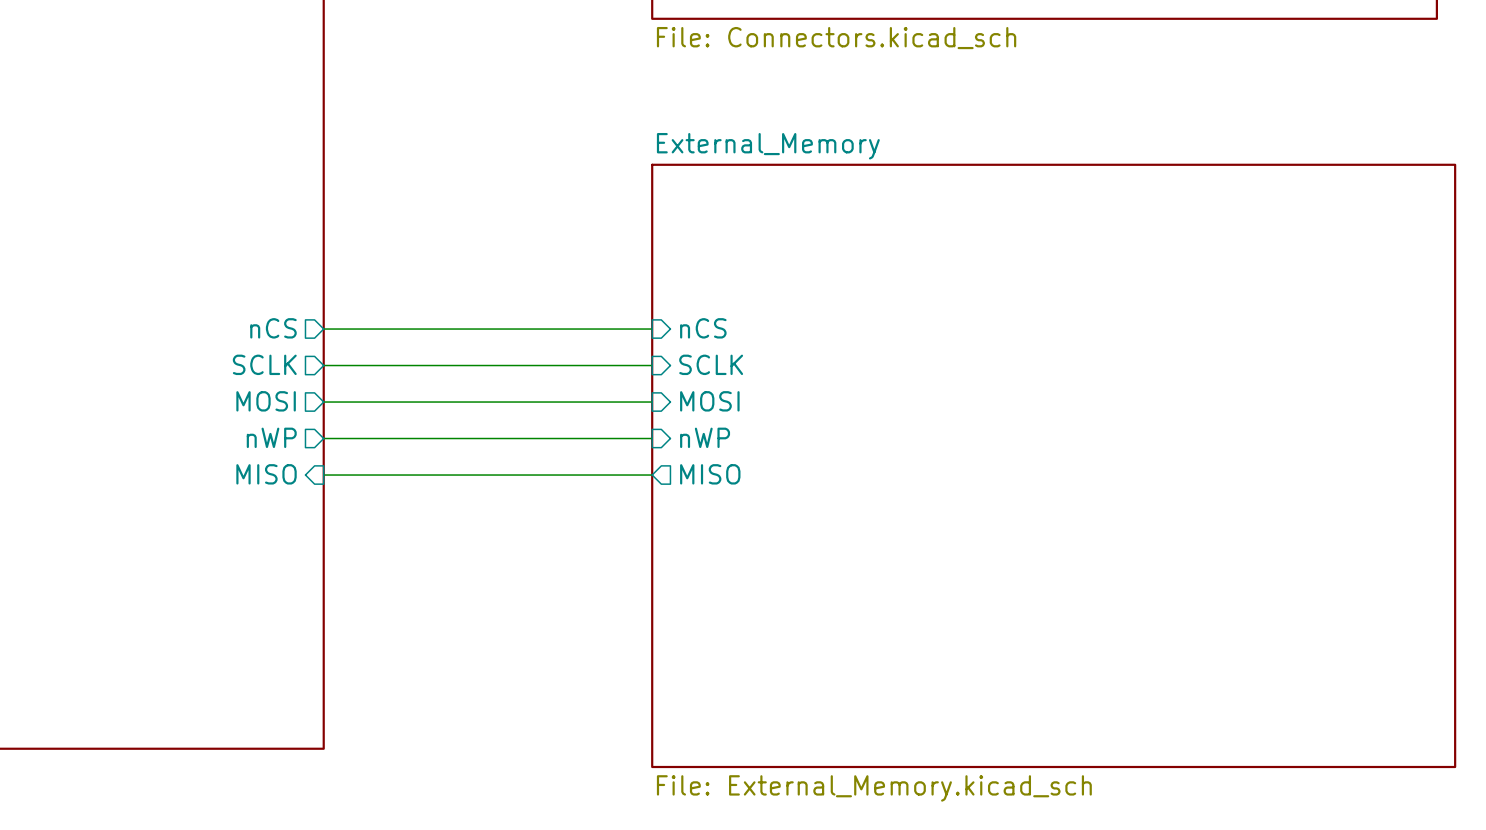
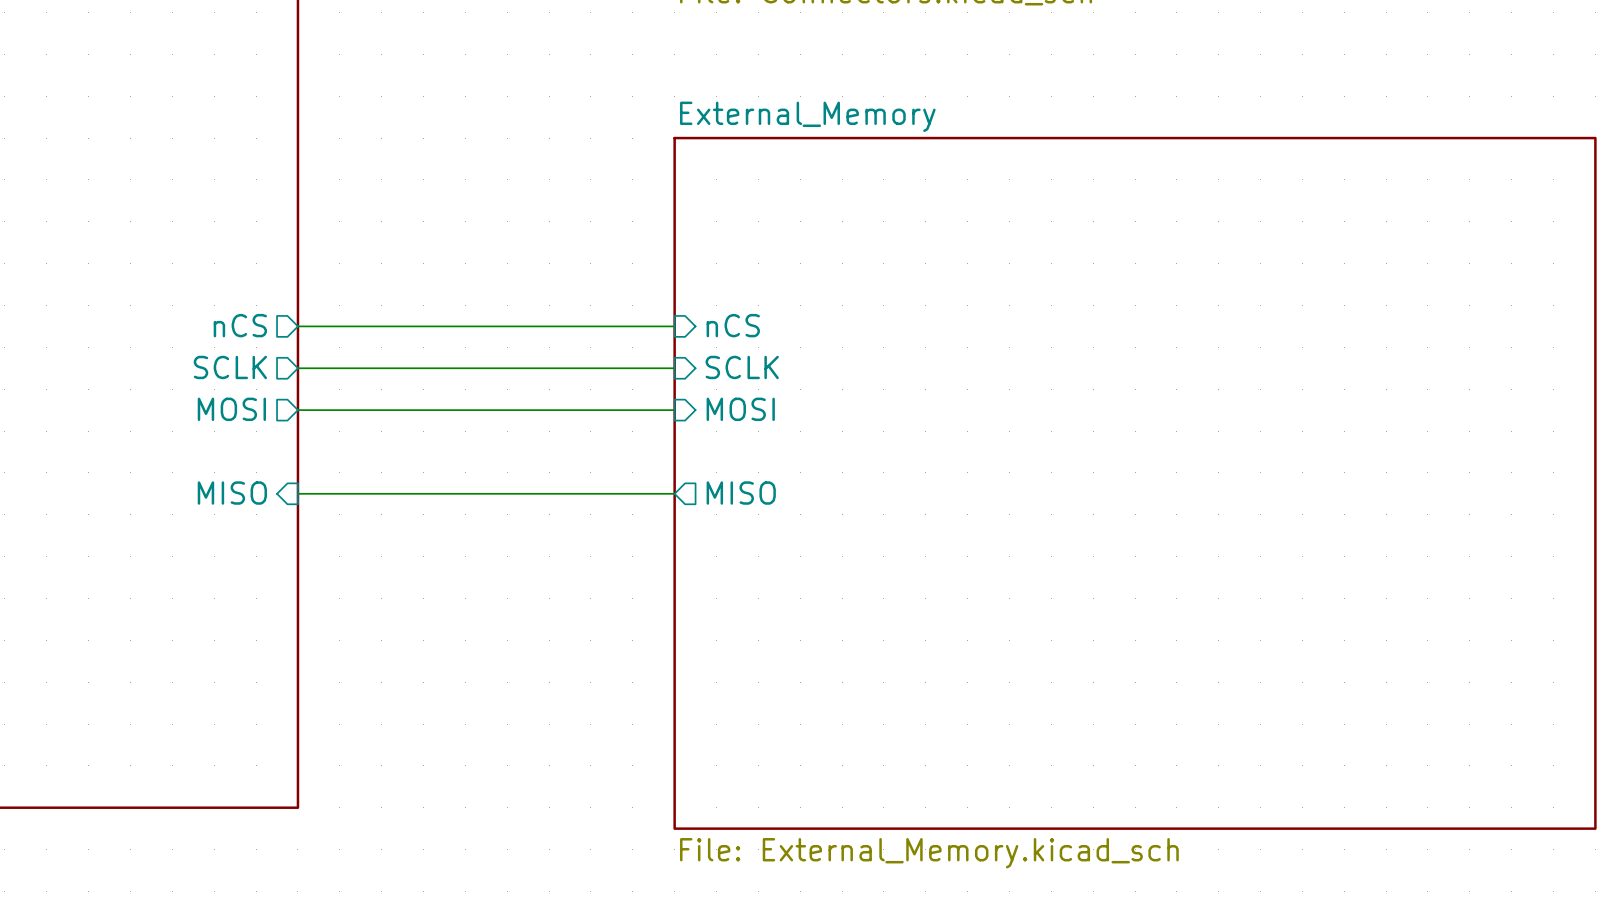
sheet pin: nWP (271, 437) -> none
sheet pin: nWP (705, 437) -> none
wire: (323, 438) (652, 438) -> none

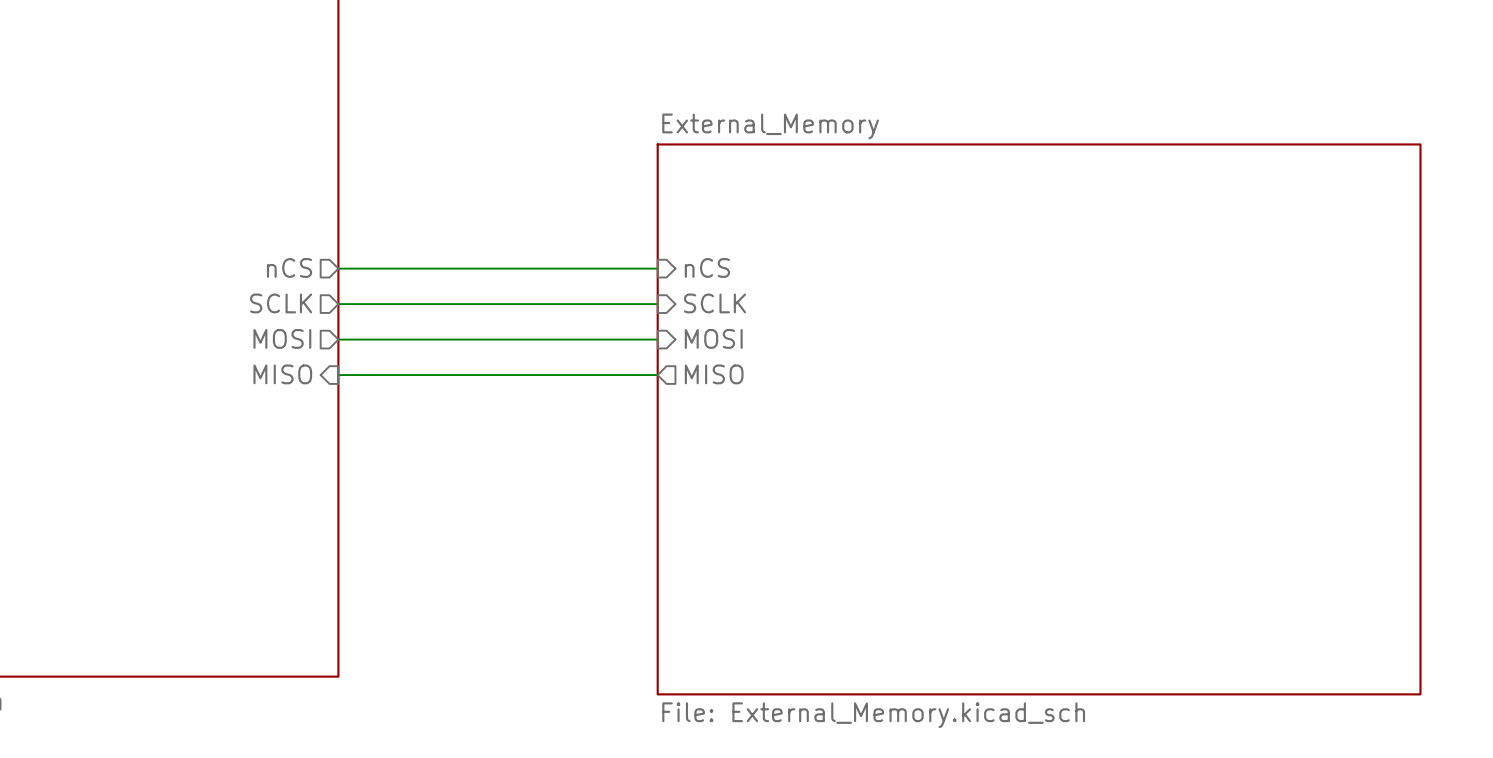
sheet External_Memory: File: External_Memory.kicad_sch (1135, 483) -> none
sheet pin position: MISO (232, 493) -> MISO (282, 374)
wire: (297, 493) (674, 493) -> (338, 375) (657, 375)
sheet pin position: MISO (741, 493) -> MISO (714, 374)
sheet External_Memory: none -> File: External_Memory.kicad_sch (1039, 419)

